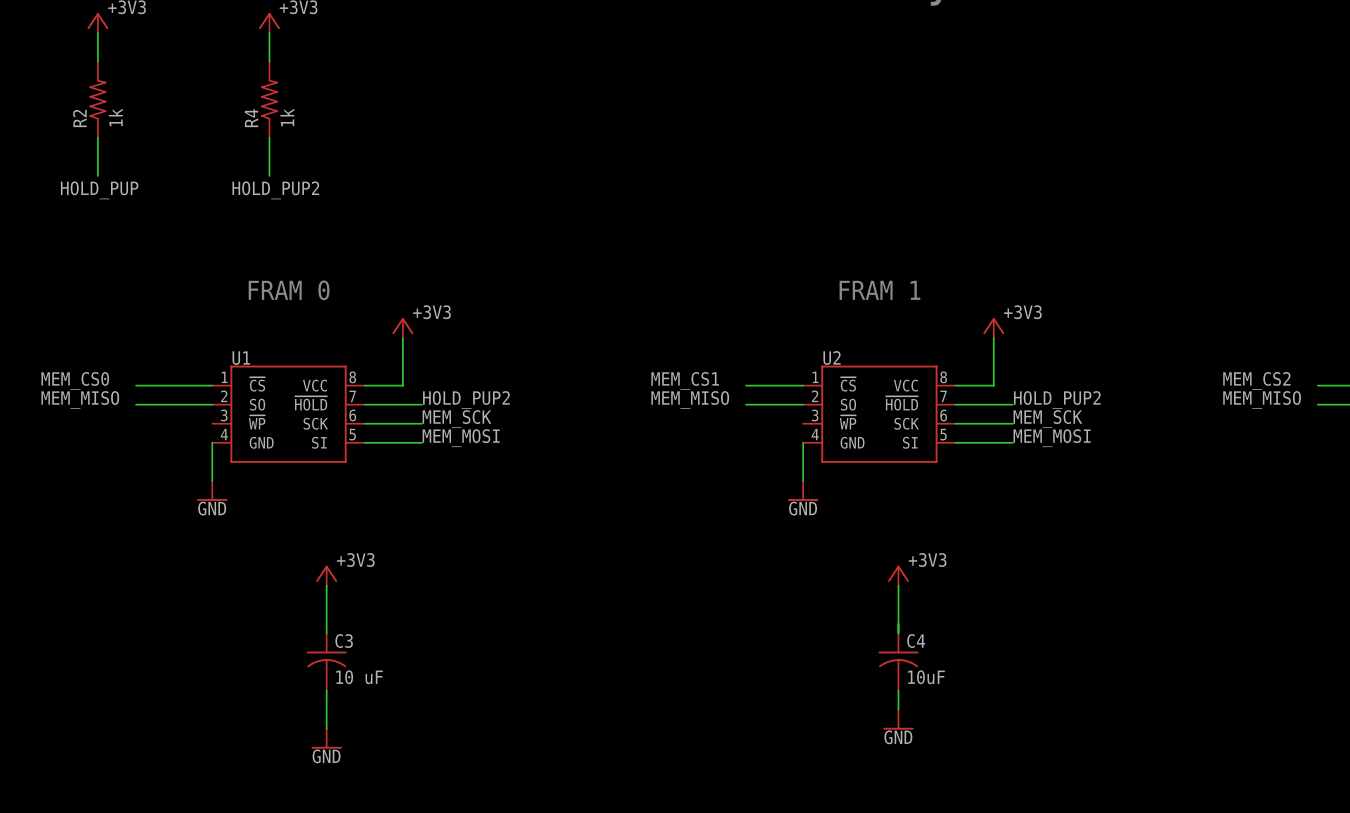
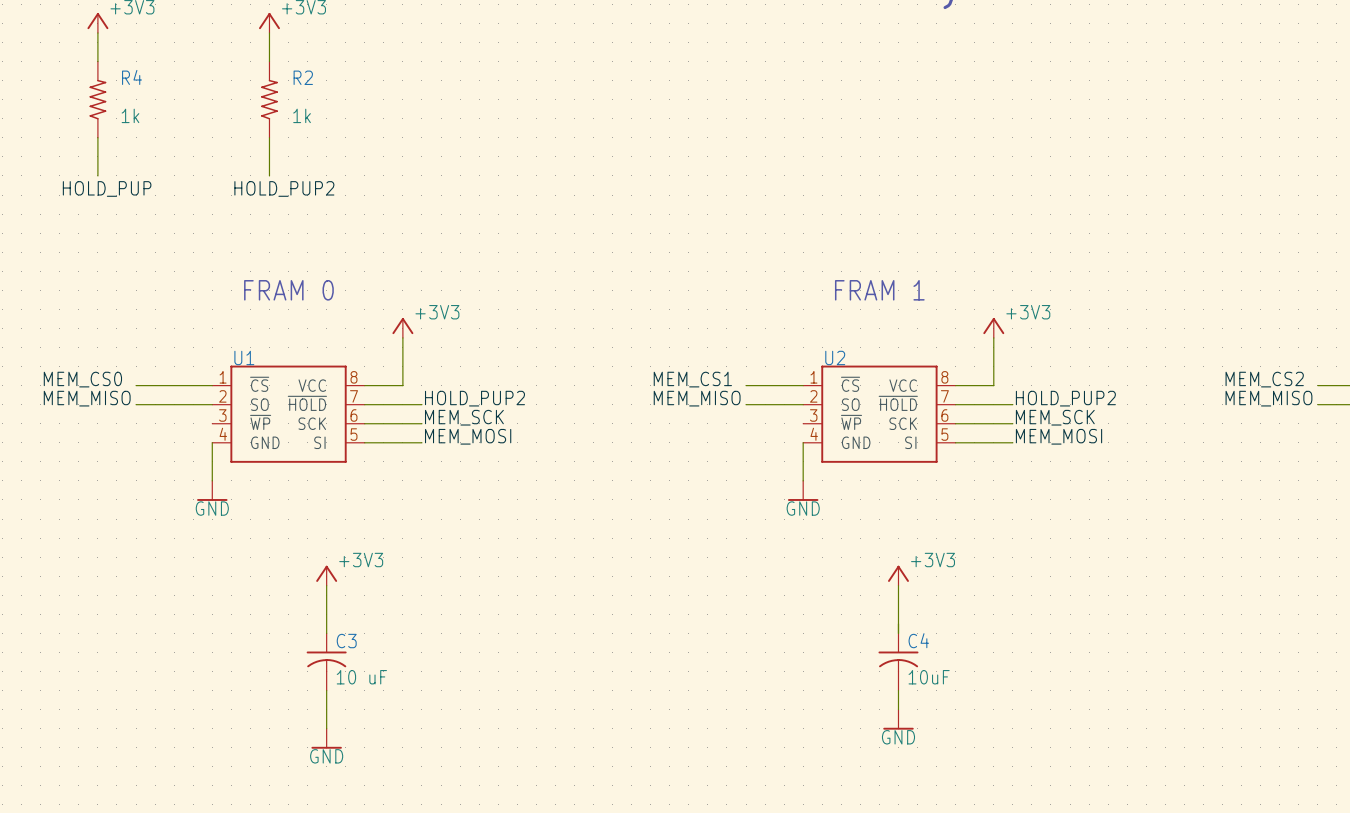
R2 value rotation: 0° (115, 117) -> 90° clockwise (130, 115)
R4 value rotation: 0° (287, 117) -> 90° clockwise (302, 115)
R2 name: R2 (79, 118) -> R4 (132, 77)
R4 name: R4 (251, 118) -> R2 (303, 77)

